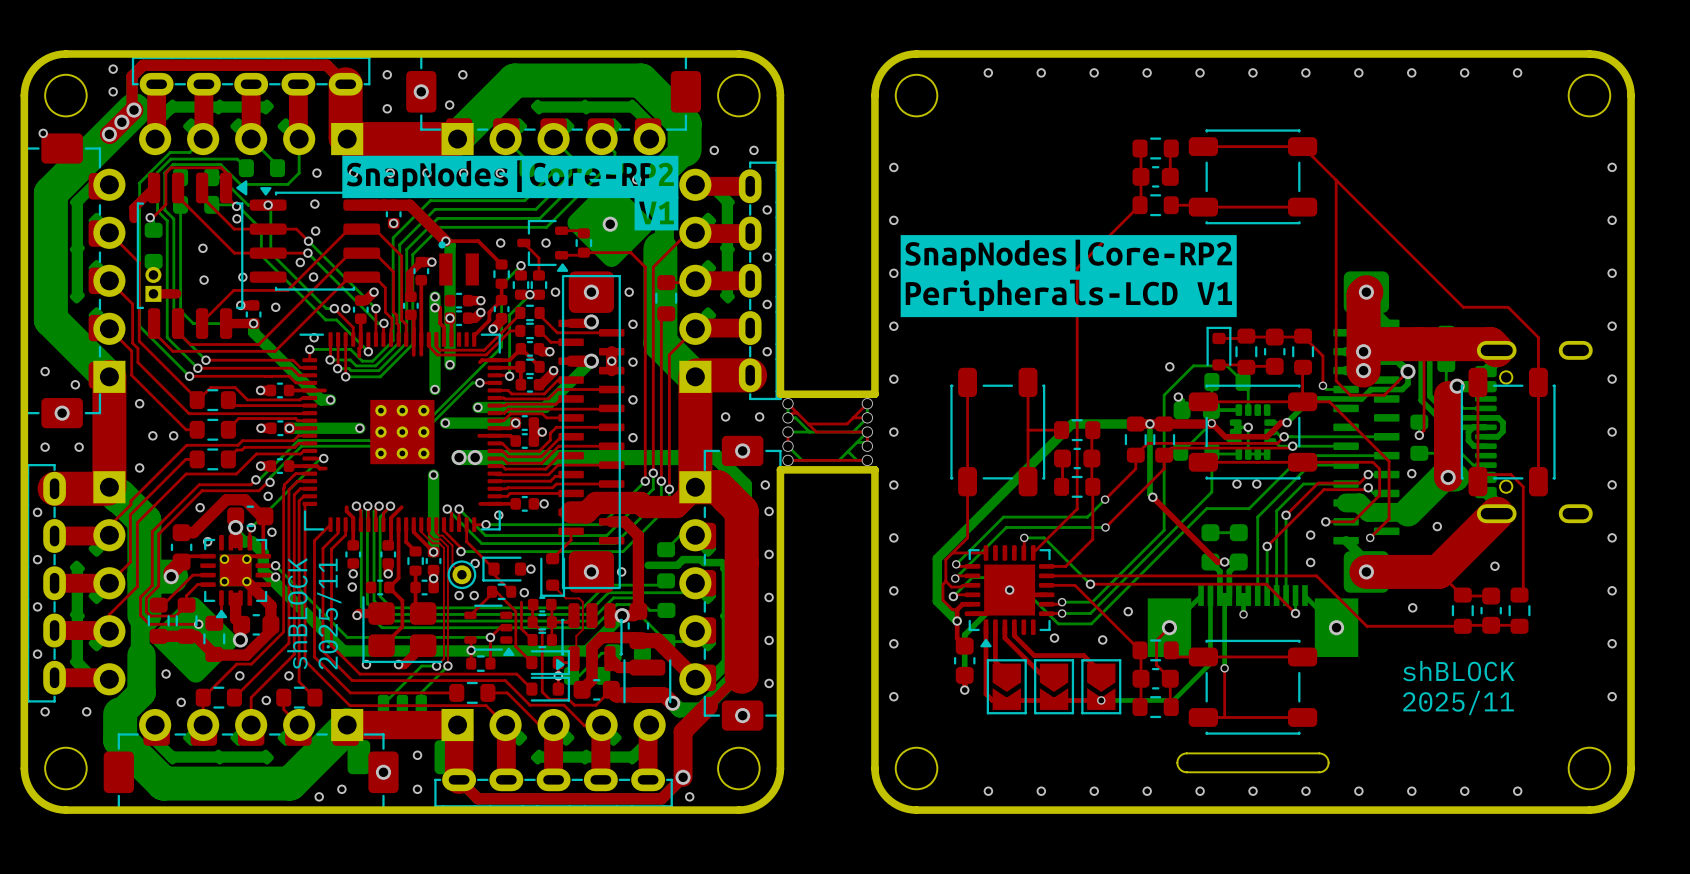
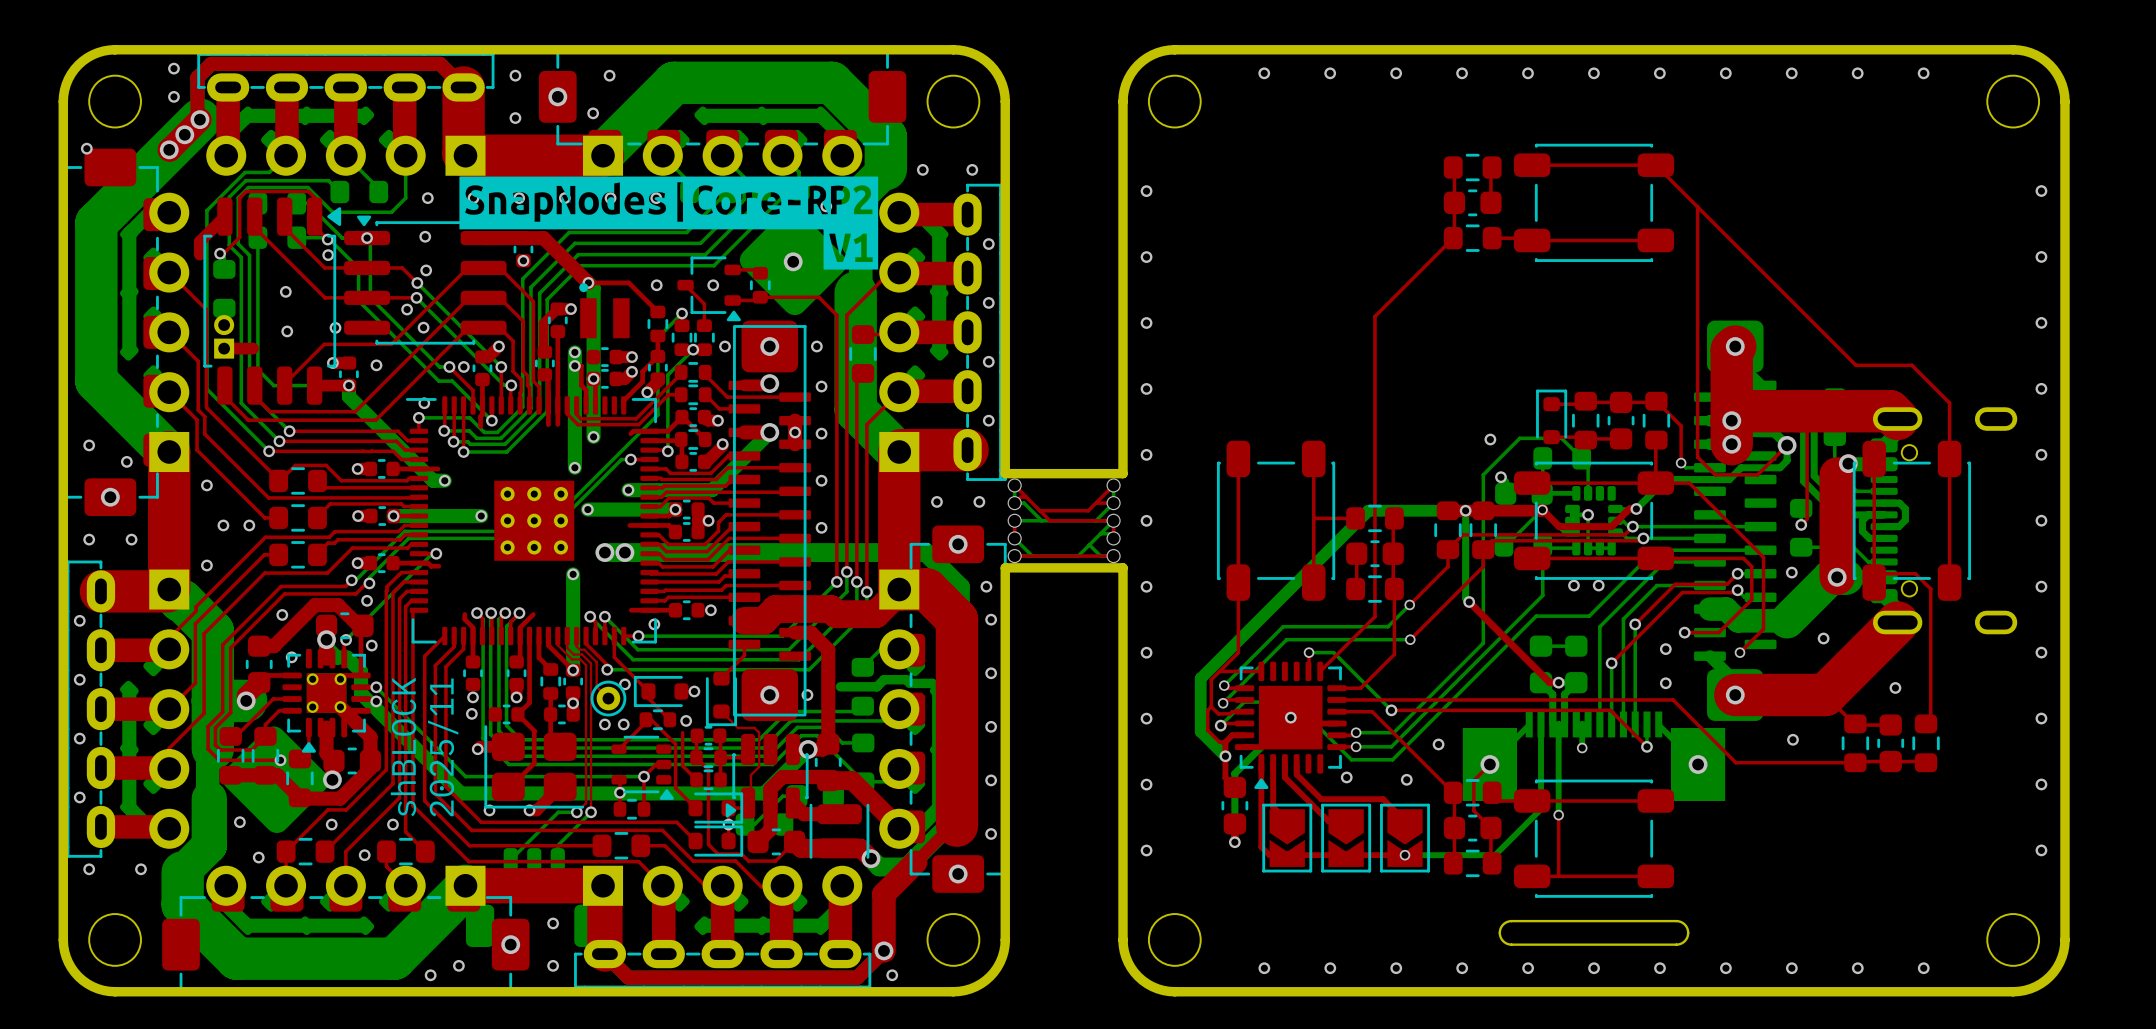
drawing: [900, 235, 1237, 318] -> none
text: shBLOCK (1458, 671) -> none
text: 2025/11 (1458, 702) -> none

